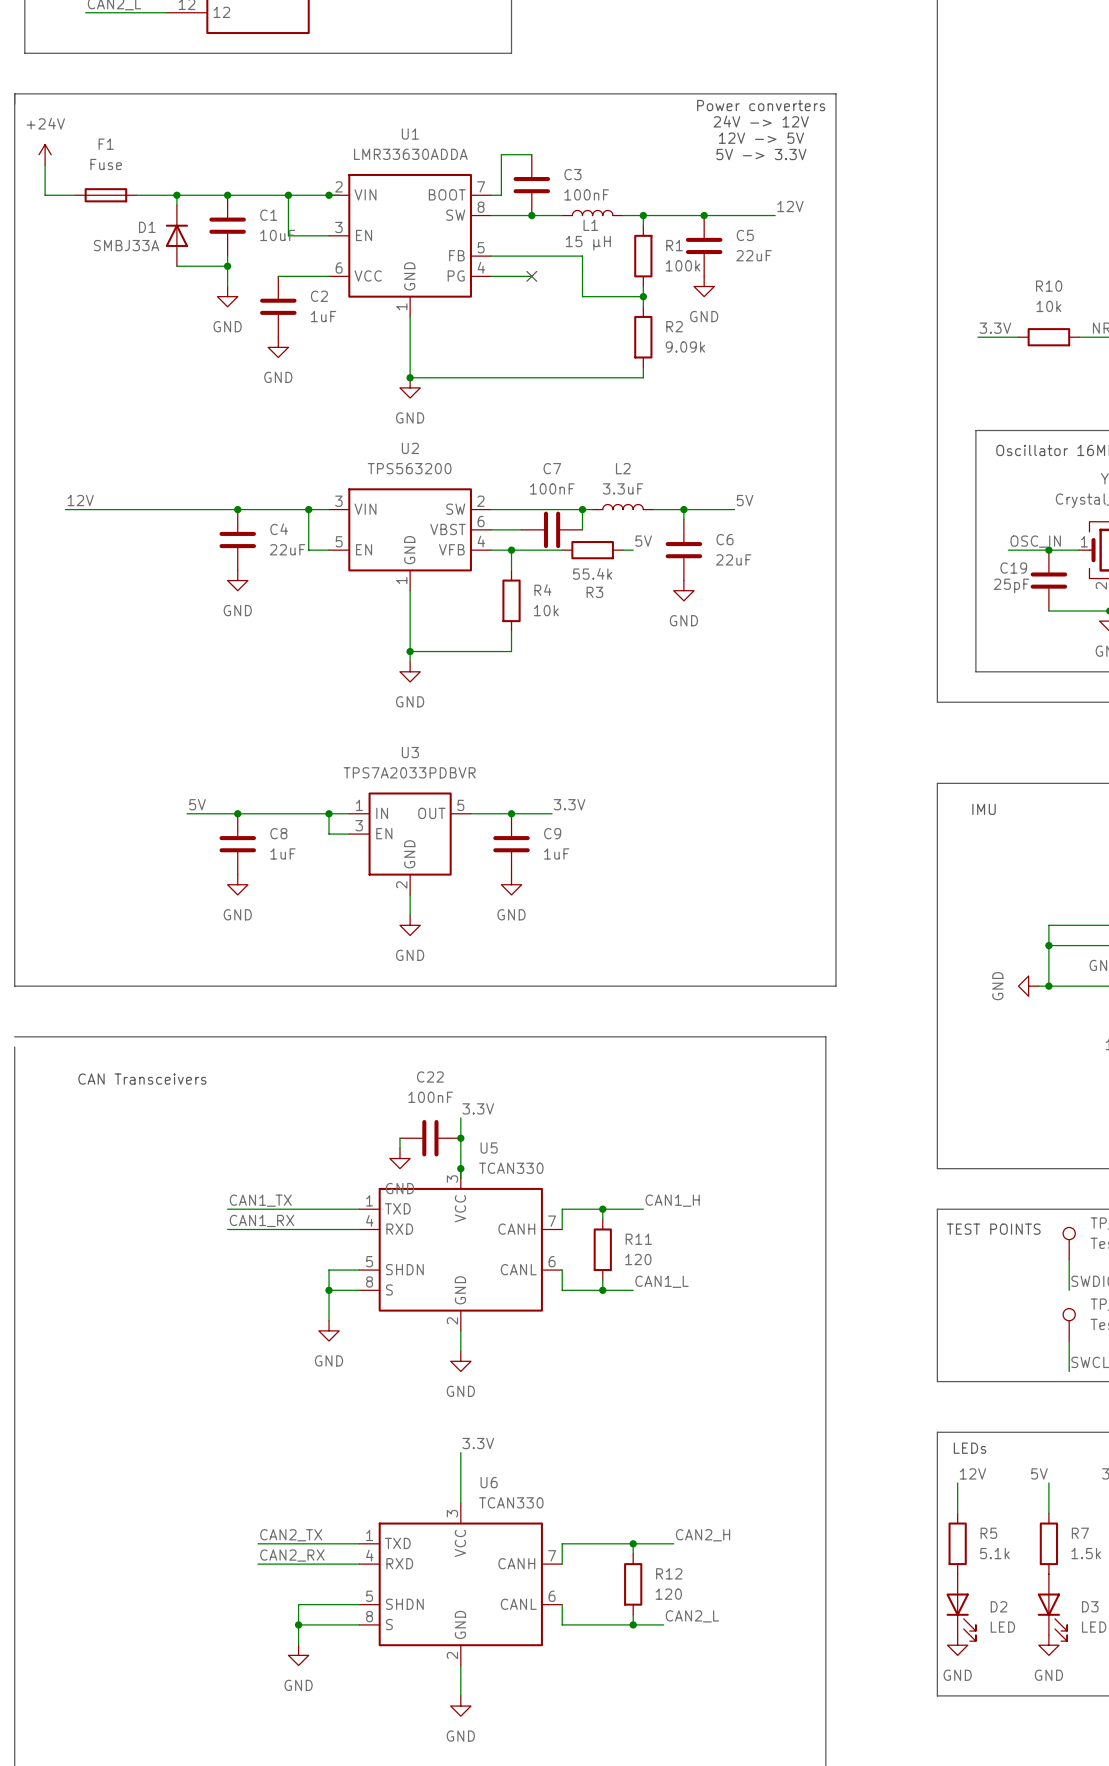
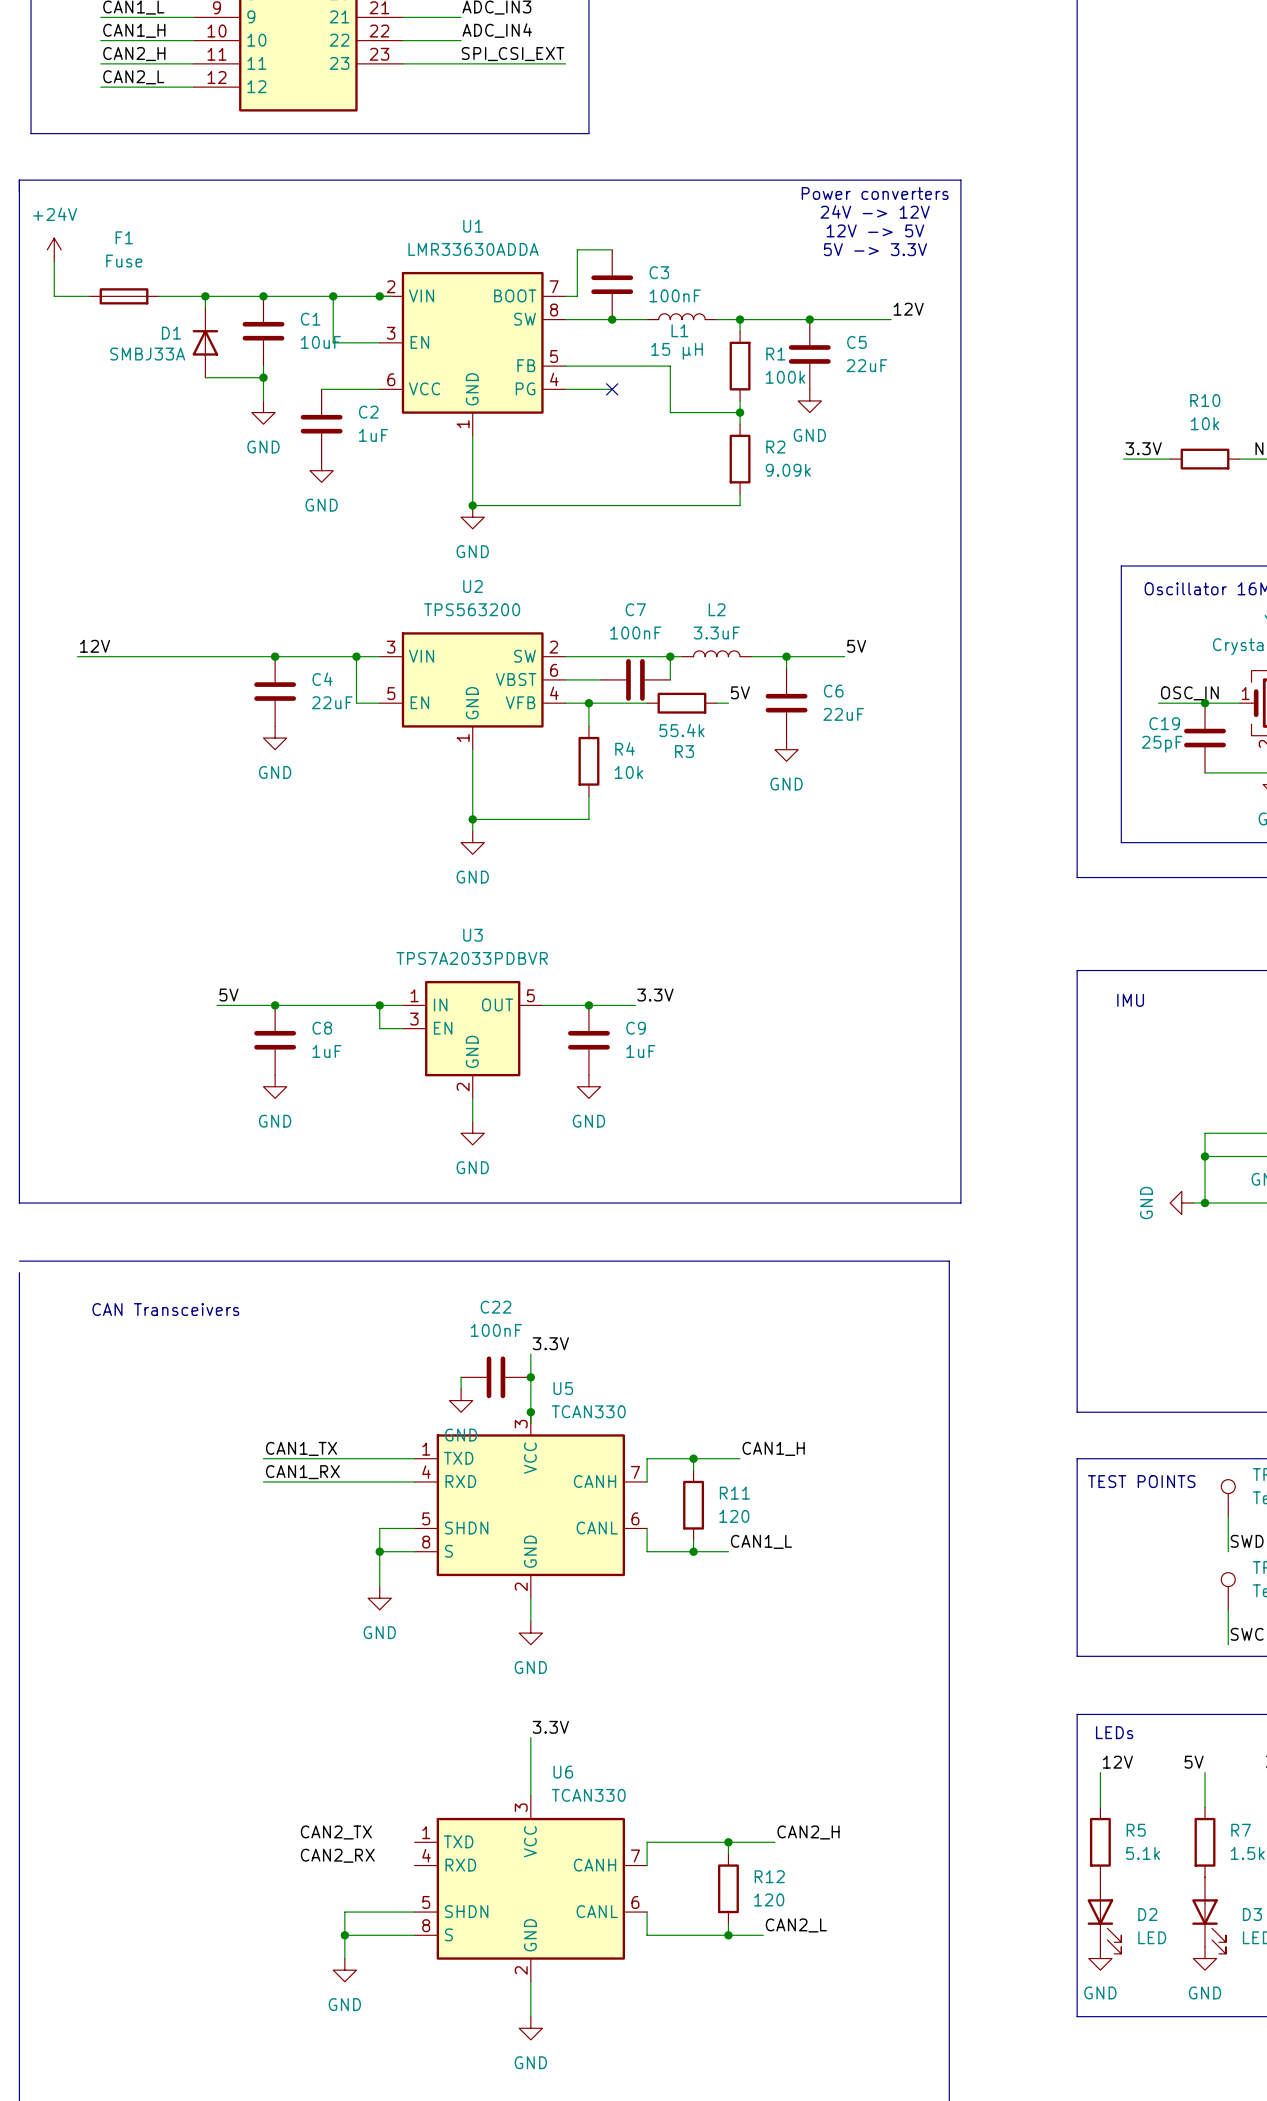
wire: (258, 1543) (359, 1543) -> none
wire: (258, 1564) (359, 1564) -> none

